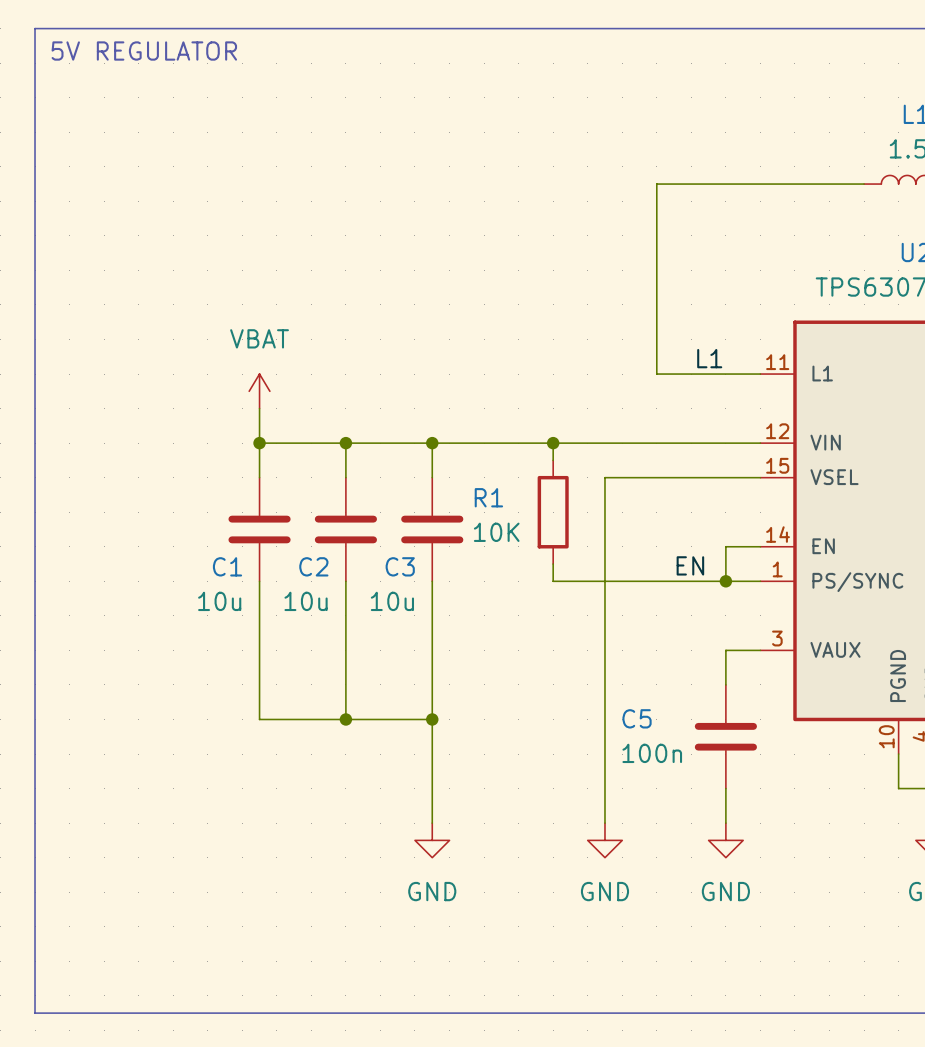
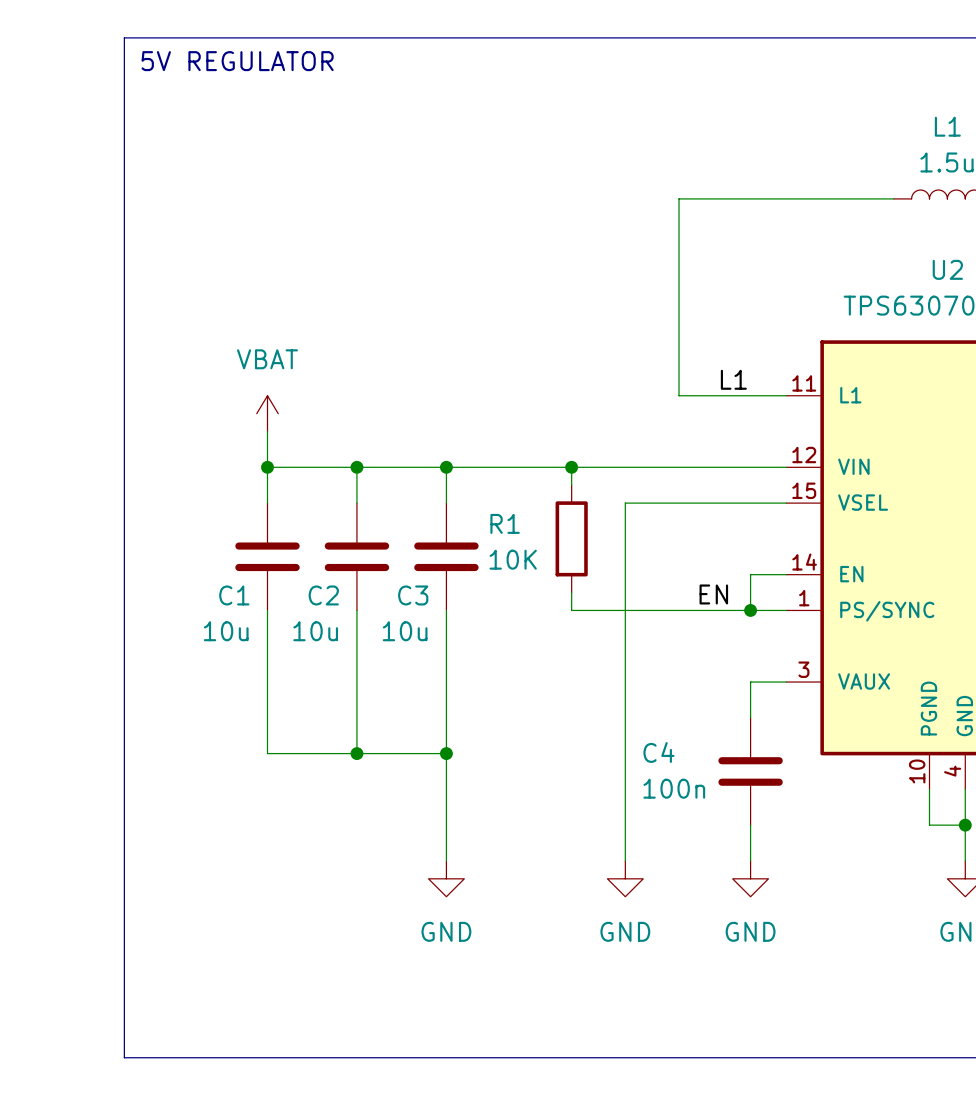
line: (121, 28) (35, 28) (35, 1013) (121, 1013) -> (124, 37) (124, 1057)
text position: 5V REGULATOR (144, 51) -> 5V REGULATOR (237, 61)
C5 name: C5 (637, 718) -> C4 (658, 752)

